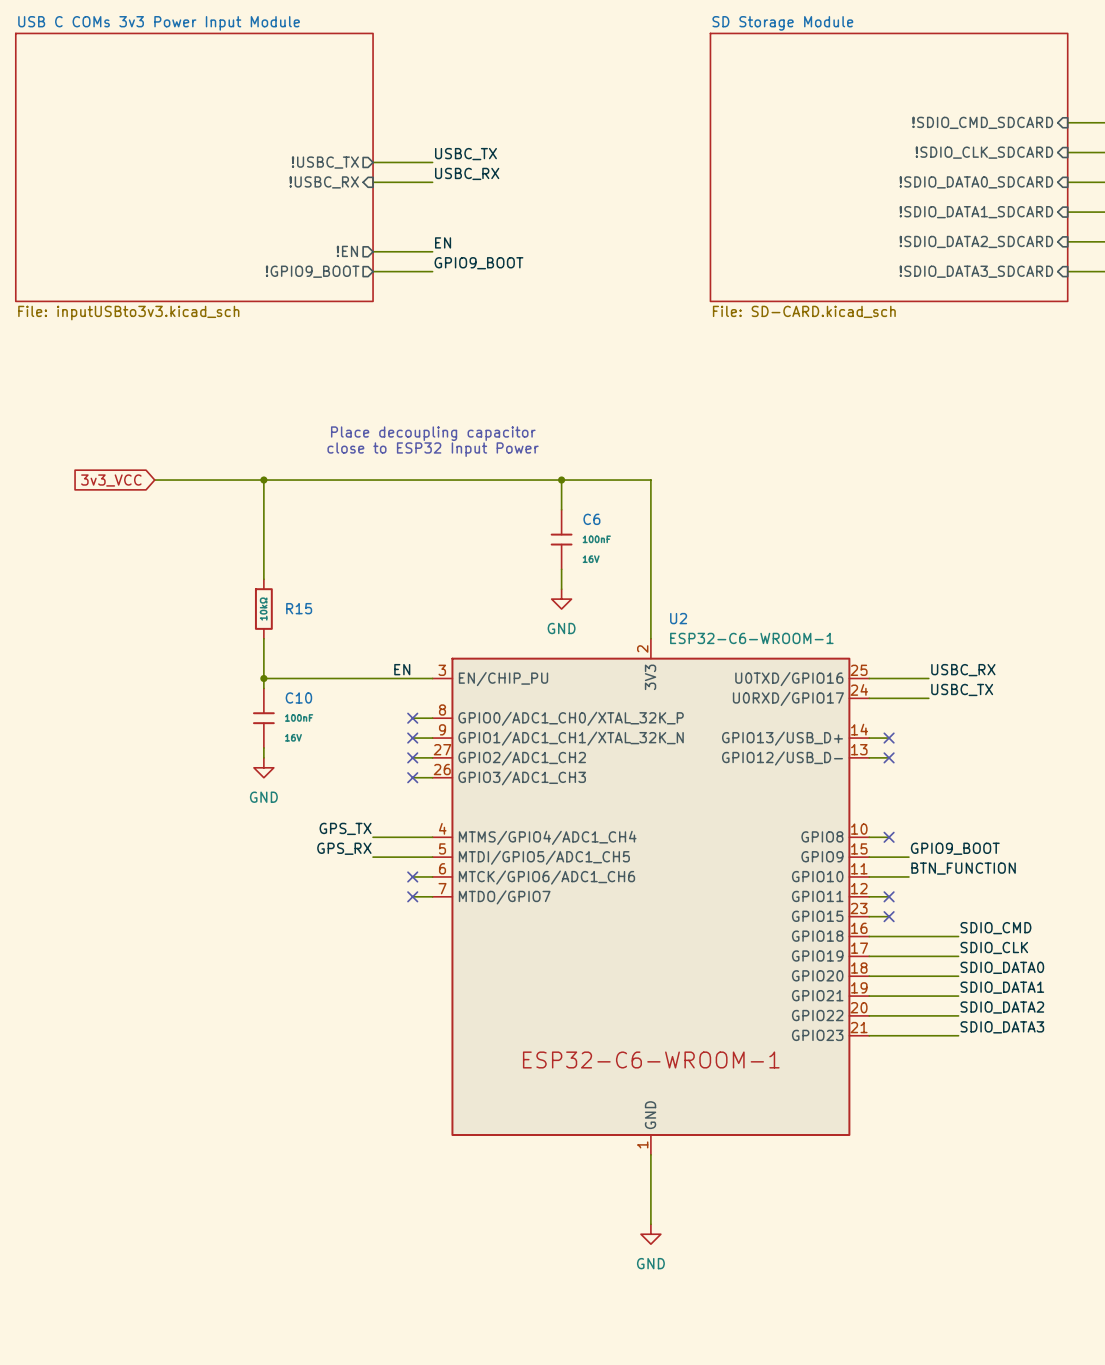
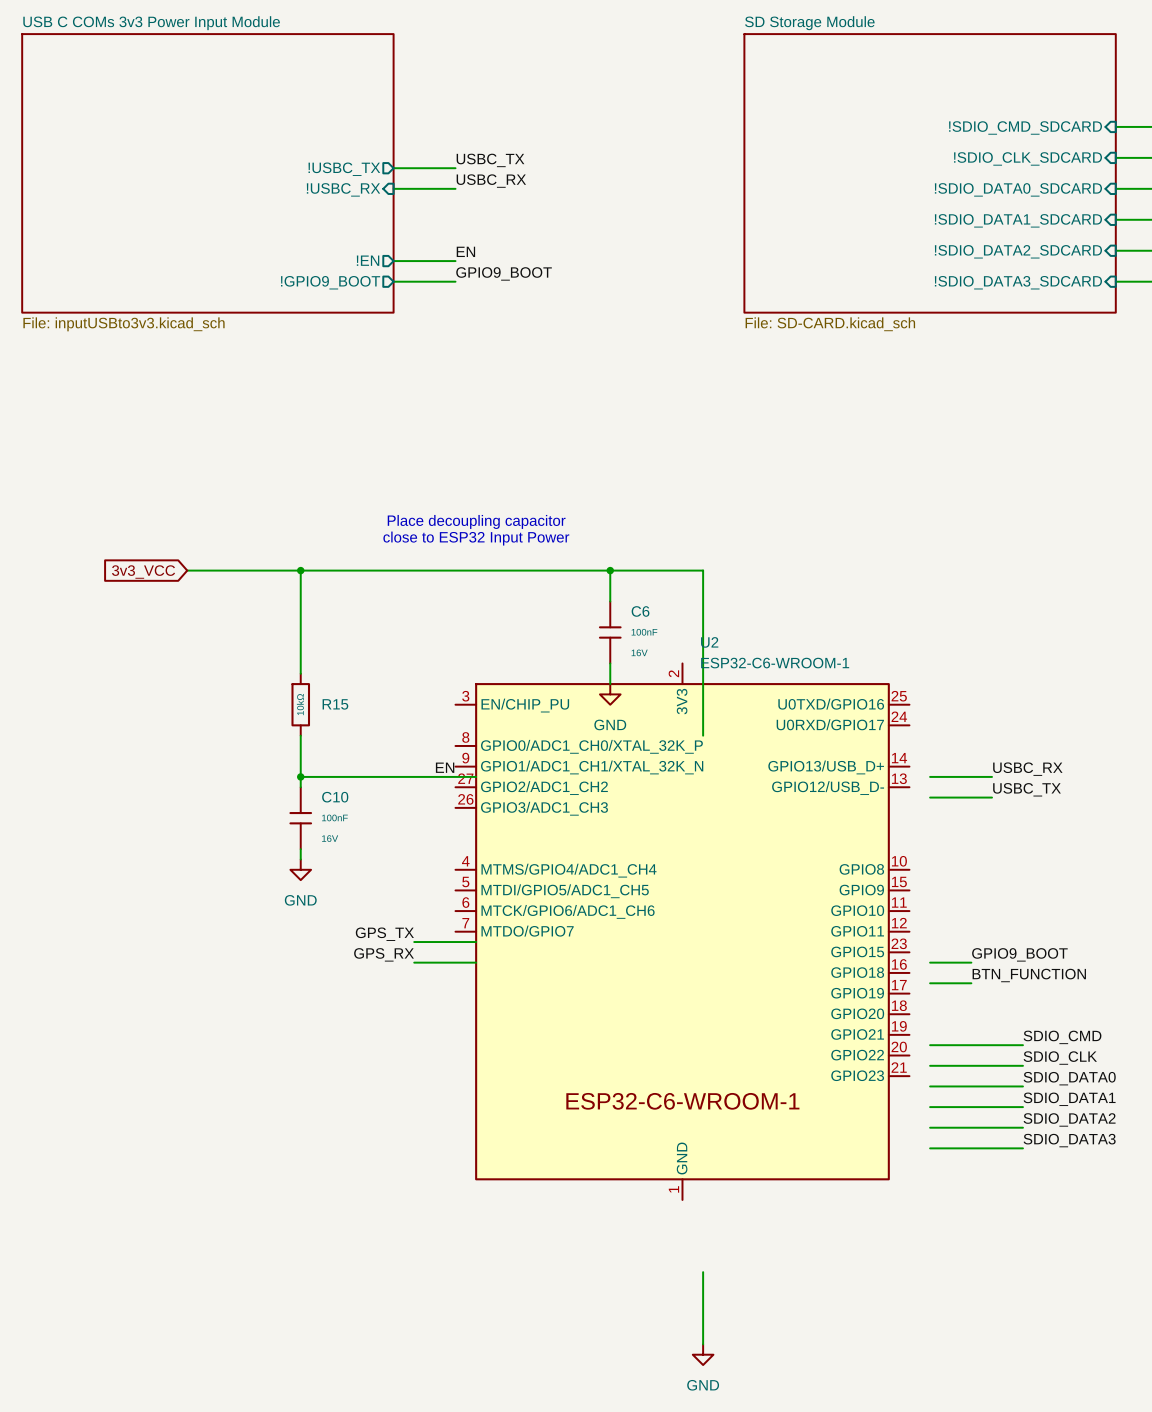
text position: Place decoupling capacitor (433, 433) -> Place decoupling capacitor (476, 521)
text position: close to ESP32 Input Power (433, 449) -> close to ESP32 Input Power (476, 538)
global label position: 3v3_VCC (111, 480) -> 3v3_VCC (143, 572)
wire: (154, 480) (650, 480) (650, 638) -> (187, 570) (703, 570) (703, 735)
wire: (263, 480) (263, 579) -> (300, 570) (300, 673)
junction: (263, 480) -> none
wire: (561, 480) (561, 509) -> (610, 570) (610, 601)
junction: (561, 480) -> none
C6 position: (561, 539) -> (610, 632)
junction: none -> (300, 570)
junction: none -> (610, 570)
wire: (561, 569) (561, 589) -> (610, 663) (610, 684)
power symbol position: GND (561, 599) -> GND (610, 694)
R15 position: (263, 609) -> (300, 704)
wire: (263, 638) (263, 688) -> (300, 735) (300, 787)
label position: EN (402, 669) -> EN (445, 767)
label position: USBC_RX (963, 670) -> USBC_RX (1027, 769)
wire: (263, 678) (432, 678) -> (300, 776) (476, 776)
junction: (263, 678) -> none
wire: (869, 678) (928, 678) -> (930, 776) (992, 776)
label position: USBC_TX (962, 689) -> USBC_TX (1027, 789)
wire: (869, 698) (928, 698) -> (930, 797) (992, 797)
C10 position: (263, 718) -> (300, 818)
wire: (412, 718) (432, 718) -> none
no-connect mark: (412, 718) -> none
wire: (412, 738) (432, 738) -> none
no-connect mark: (412, 738) -> none
wire: (869, 738) (889, 738) -> none
no-connect mark: (889, 738) -> none
wire: (263, 747) (263, 757) -> (300, 849) (300, 859)
junction: none -> (300, 776)
wire: (412, 757) (432, 757) -> none
no-connect mark: (412, 757) -> none
wire: (869, 757) (889, 757) -> none
no-connect mark: (889, 757) -> none
power symbol position: GND (263, 767) -> GND (300, 869)
wire: (412, 777) (432, 777) -> none
no-connect mark: (412, 777) -> none
label position: GPS_TX (345, 828) -> GPS_TX (384, 934)
wire: (373, 837) (432, 837) -> (414, 942) (476, 942)
wire: (869, 837) (889, 837) -> none
no-connect mark: (889, 837) -> none
label position: GPS_RX (344, 848) -> GPS_RX (384, 954)
label position: GPIO9_BOOT (955, 848) -> GPIO9_BOOT (1019, 954)
wire: (373, 857) (432, 857) -> (414, 962) (476, 962)
wire: (869, 857) (908, 857) -> (930, 962) (971, 962)
label position: BTN_FUNCTION (963, 868) -> BTN_FUNCTION (1029, 975)
wire: (412, 876) (432, 876) -> none
no-connect mark: (412, 876) -> none
wire: (869, 876) (908, 876) -> (930, 983) (971, 983)
wire: (412, 896) (432, 896) -> none
no-connect mark: (412, 896) -> none
wire: (869, 896) (889, 896) -> none
no-connect mark: (889, 896) -> none
wire: (869, 916) (889, 916) -> none
no-connect mark: (889, 916) -> none
label position: SDIO_CMD (995, 928) -> SDIO_CMD (1062, 1037)
wire: (869, 936) (958, 936) -> (930, 1045) (1022, 1045)
label position: SDIO_CLK (994, 947) -> SDIO_CLK (1060, 1058)
wire: (869, 956) (958, 956) -> (930, 1065) (1022, 1065)
label position: SDIO_DATA0 (1002, 967) -> SDIO_DATA0 (1069, 1078)
wire: (869, 976) (958, 976) -> (930, 1086) (1022, 1086)
label position: SDIO_DATA1 (1002, 987) -> SDIO_DATA1 (1069, 1099)
wire: (869, 996) (958, 996) -> (930, 1107) (1022, 1107)
label position: SDIO_DATA2 (1002, 1007) -> SDIO_DATA2 (1069, 1119)
wire: (869, 1015) (958, 1015) -> (930, 1127) (1022, 1127)
label position: SDIO_DATA3 (1002, 1027) -> SDIO_DATA3 (1069, 1140)
wire: (869, 1035) (958, 1035) -> (930, 1148) (1022, 1148)
wire: (650, 1154) (650, 1224) -> (703, 1272) (703, 1344)
power symbol position: GND (650, 1234) -> GND (703, 1354)

